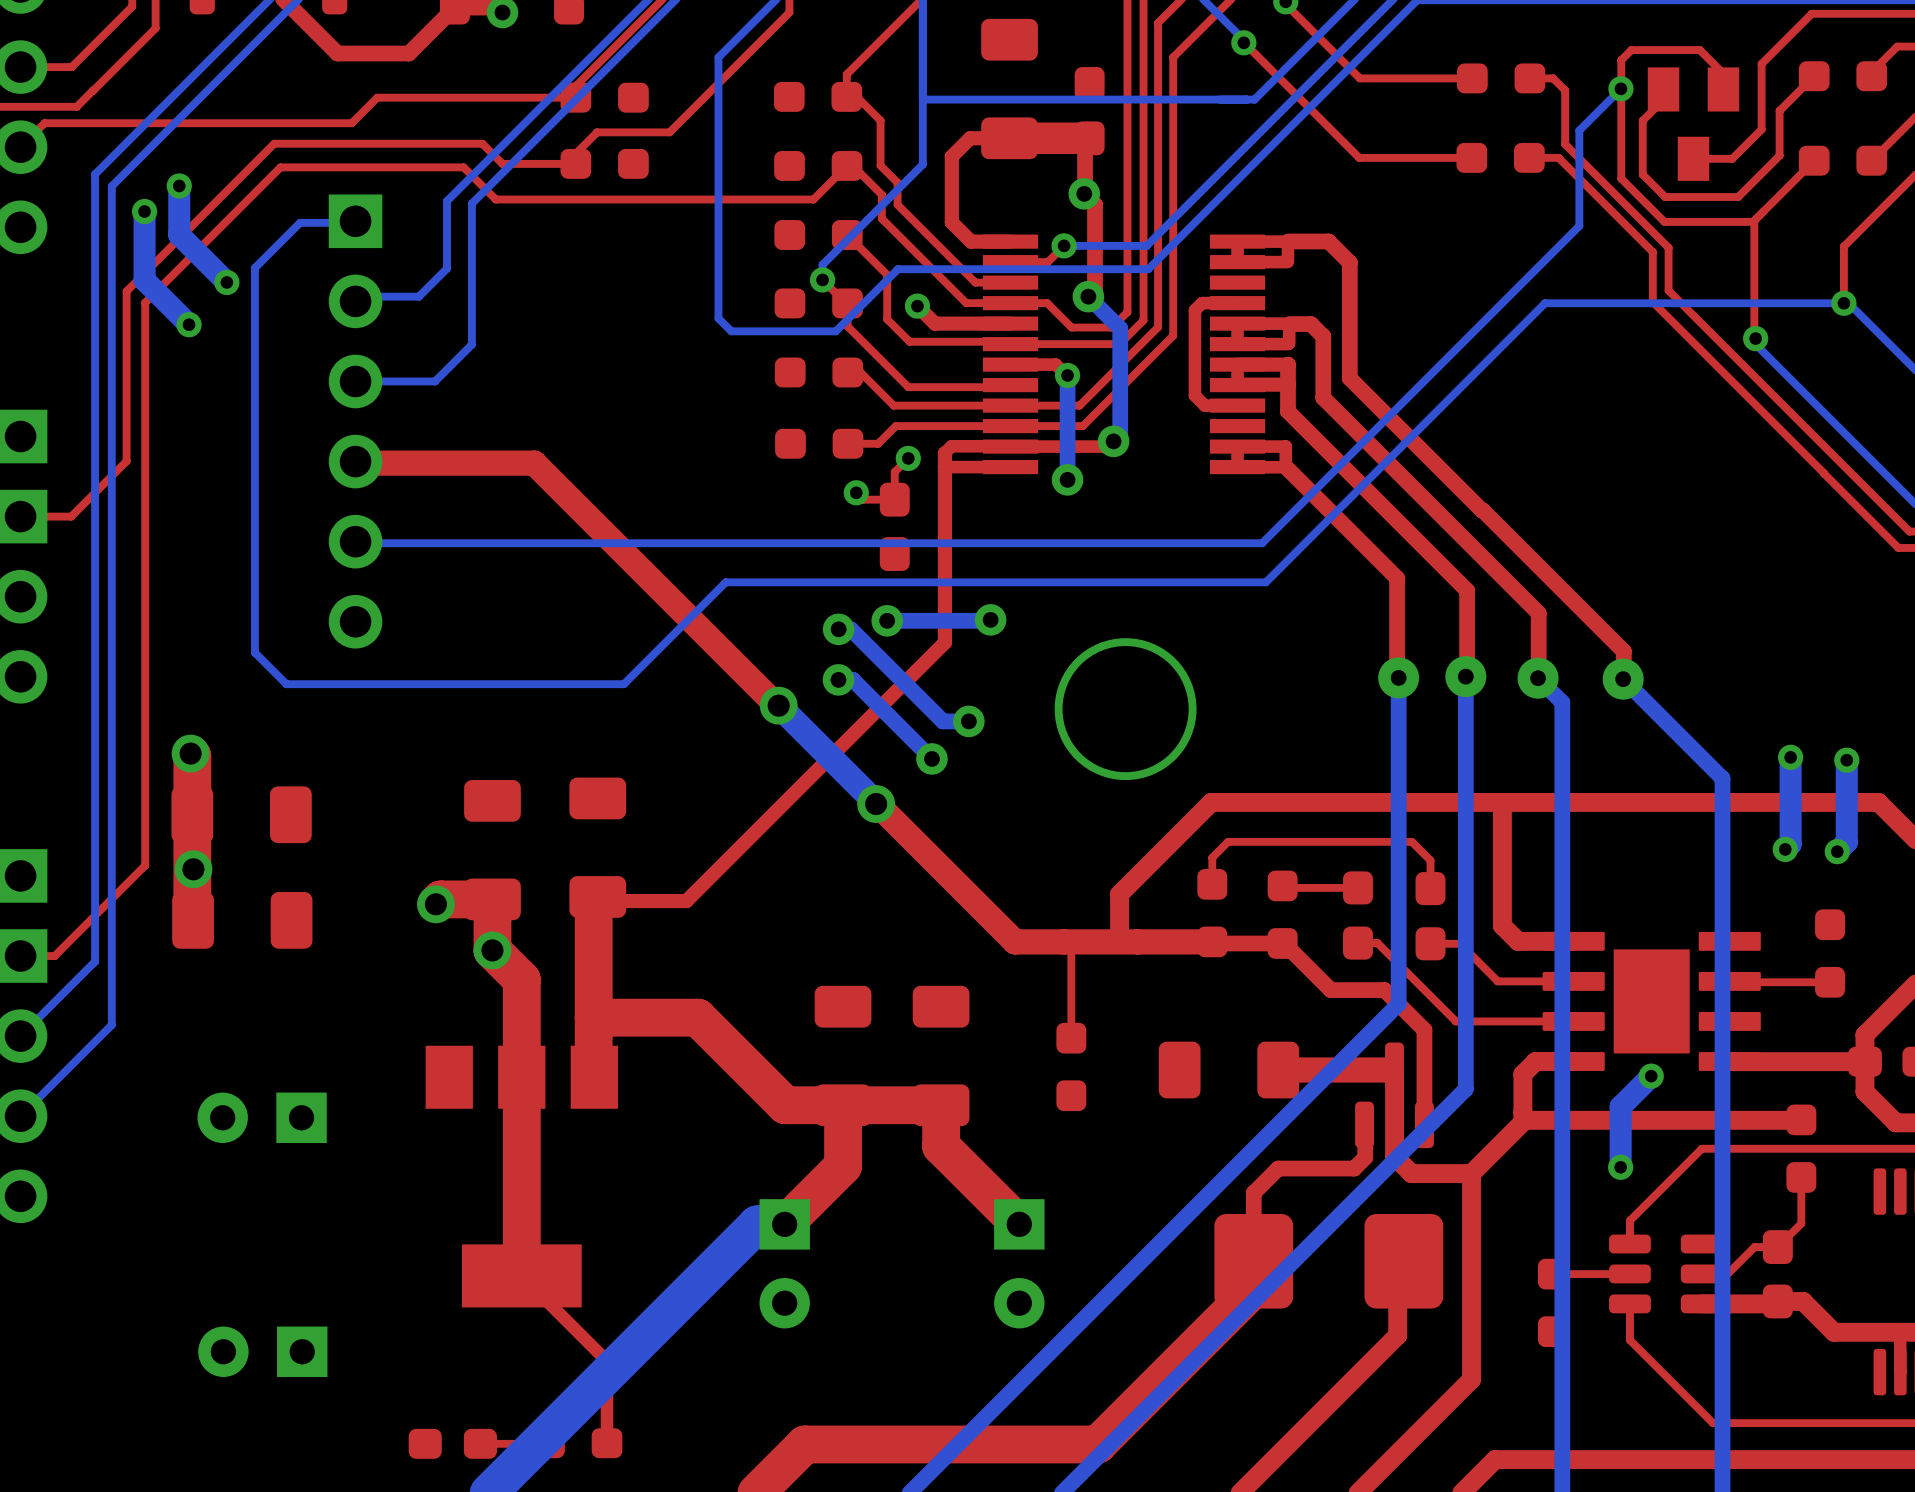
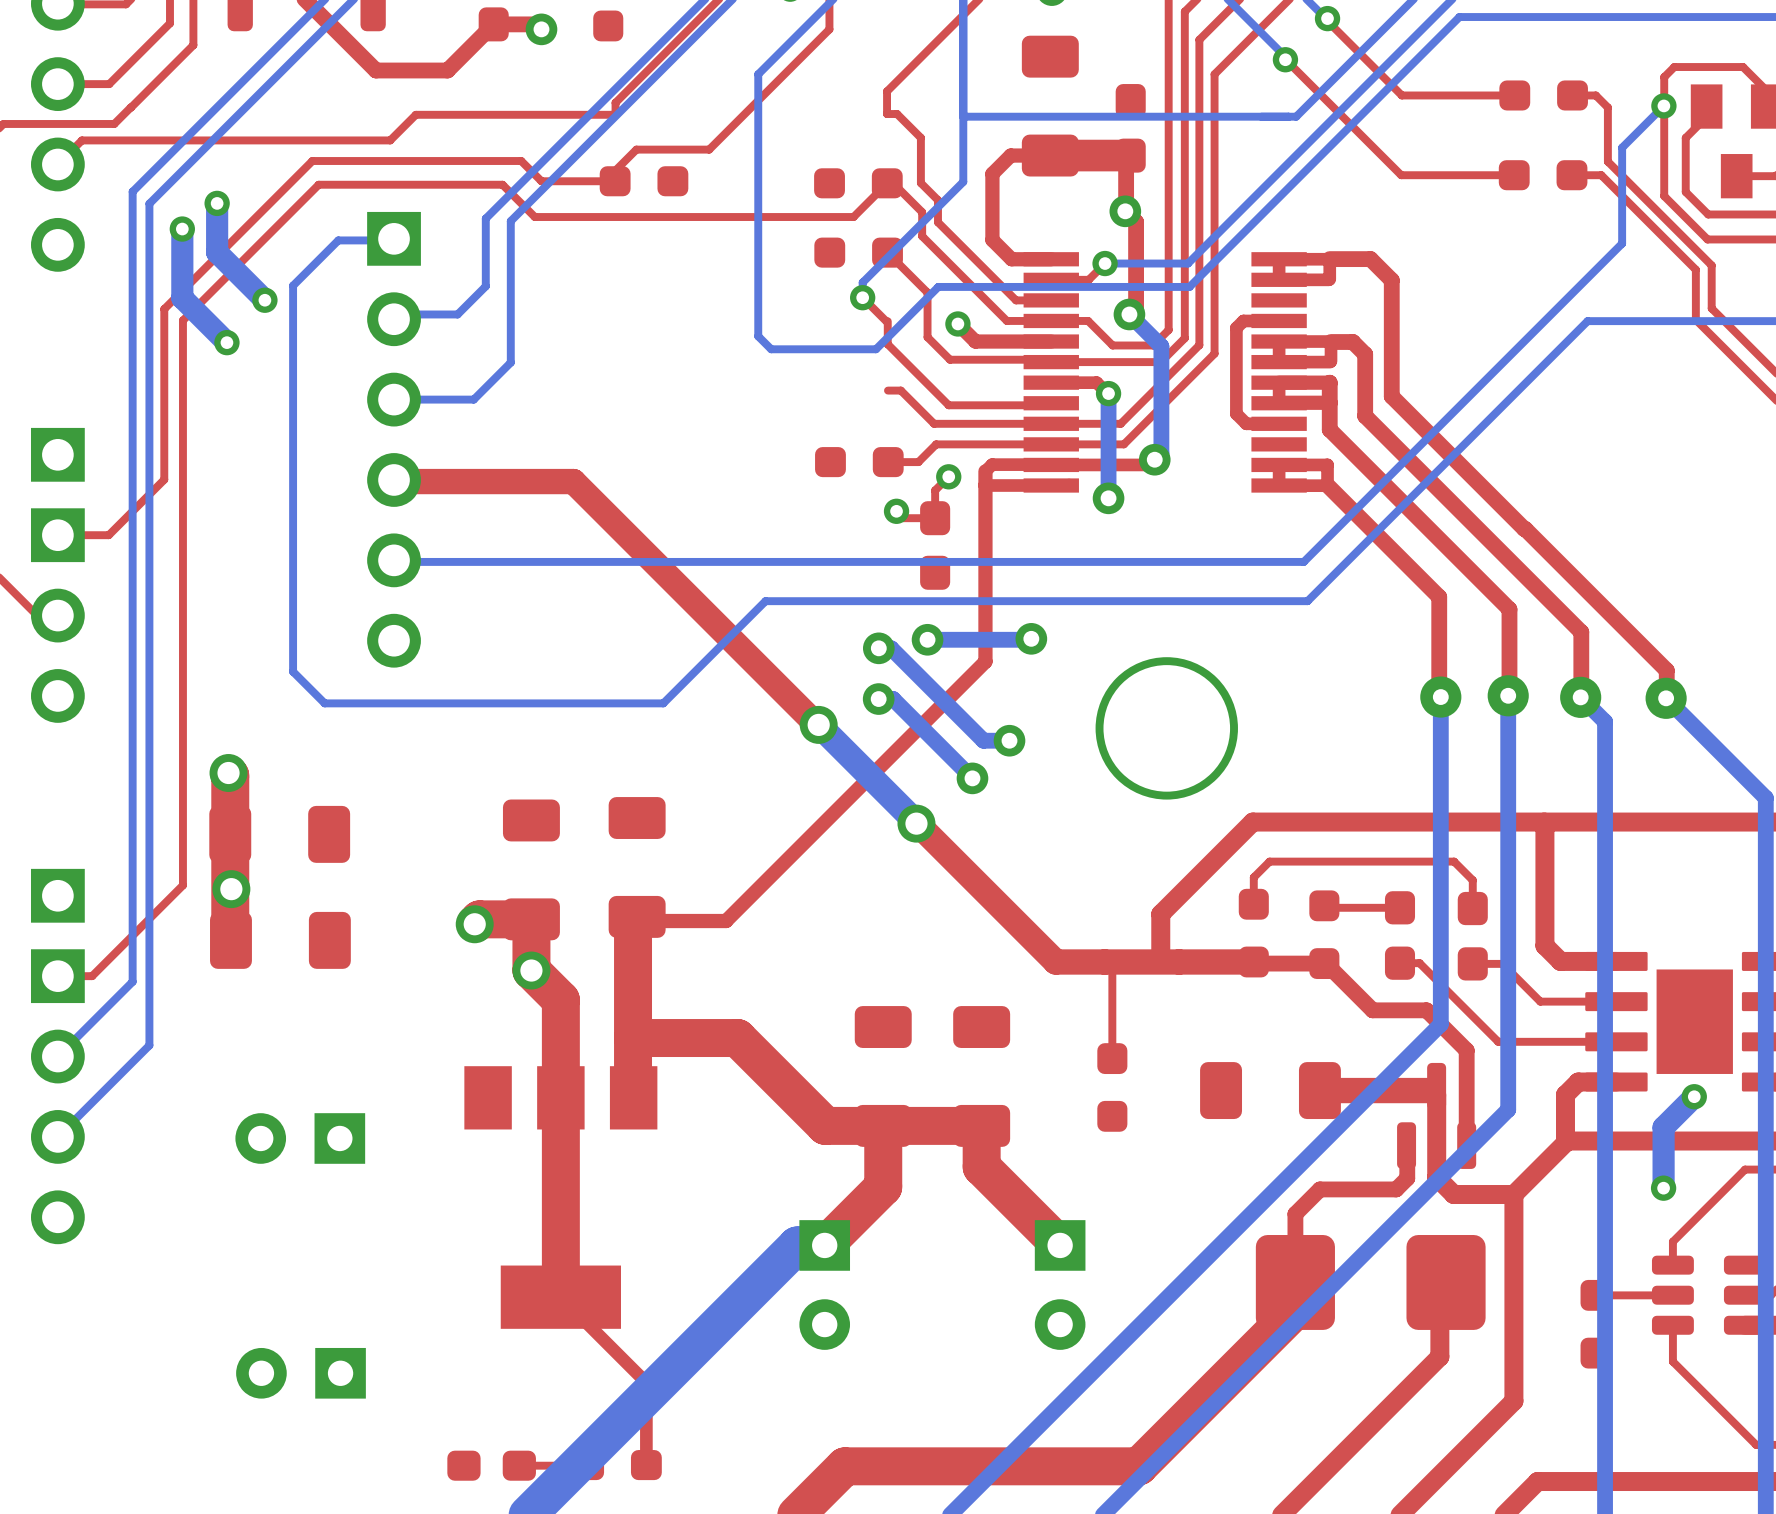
part: (818, 96) -> none
part: (604, 97) -> none
part: (818, 303) -> none
part: (819, 372) -> none

